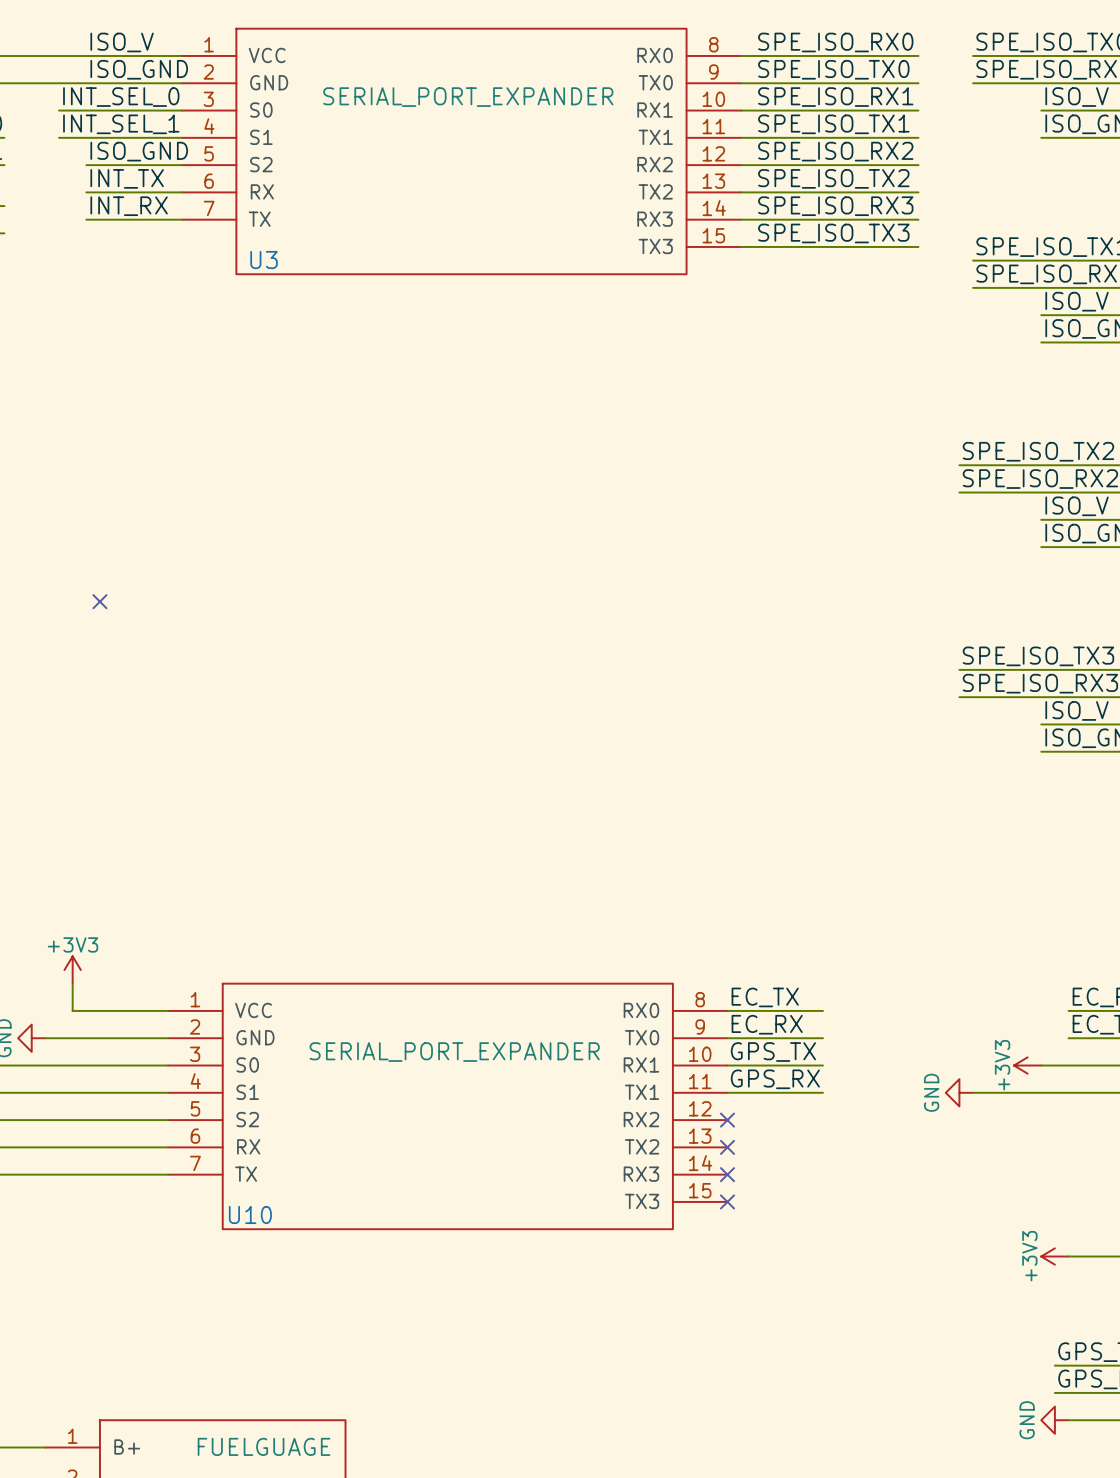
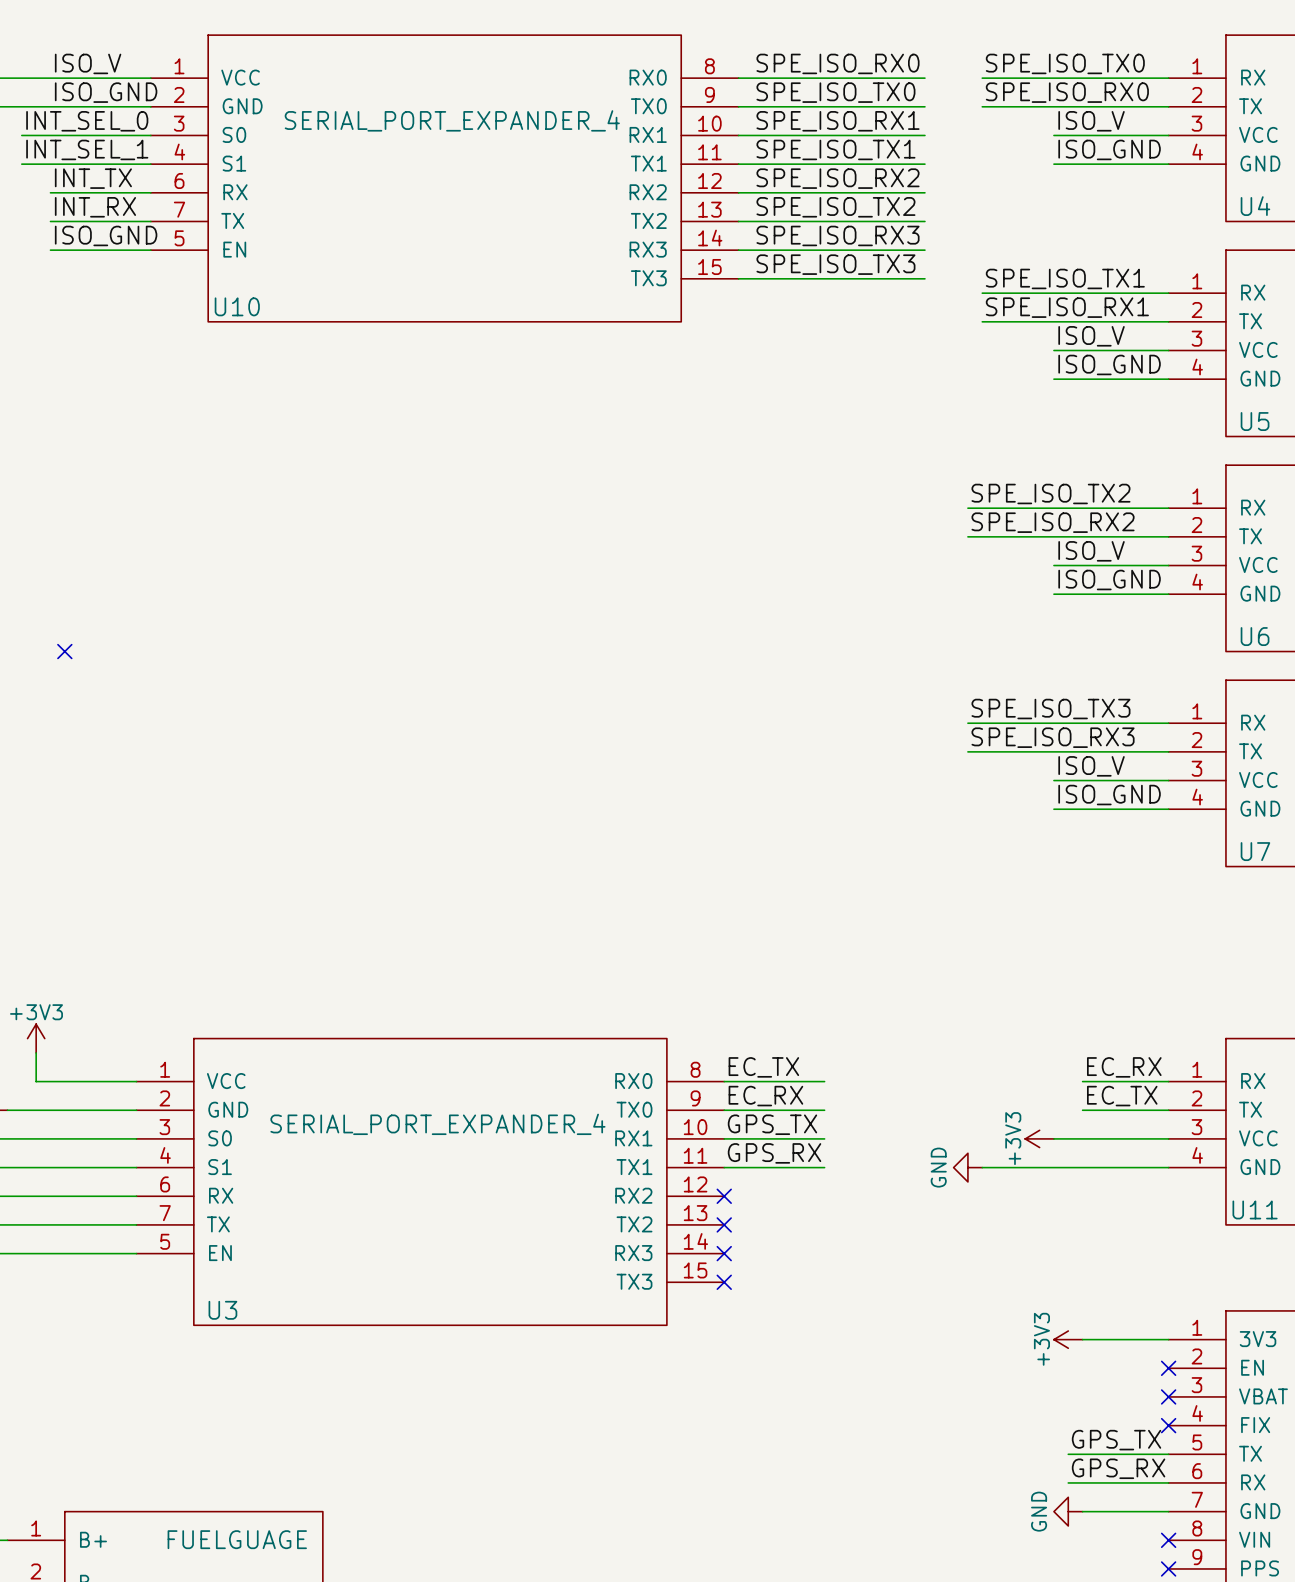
U3 symbol: [181, 28, 742, 275] -> [136, 1038, 725, 1326]
U3 value: SERIAL_PORT_EXPANDER (468, 97) -> SERIAL_PORT_EXPANDER_4 (437, 1124)
label: ISO_GND (139, 151) -> INT_TX (93, 178)
label: INT_TX (127, 178) -> INT_RX (95, 207)
label: INT_RX (129, 206) -> ISO_GND (106, 235)
U10 symbol: [168, 983, 728, 1230] -> [150, 35, 739, 322]
U10 value: SERIAL_PORT_EXPANDER (454, 1052) -> SERIAL_PORT_EXPANDER_4 (452, 120)

